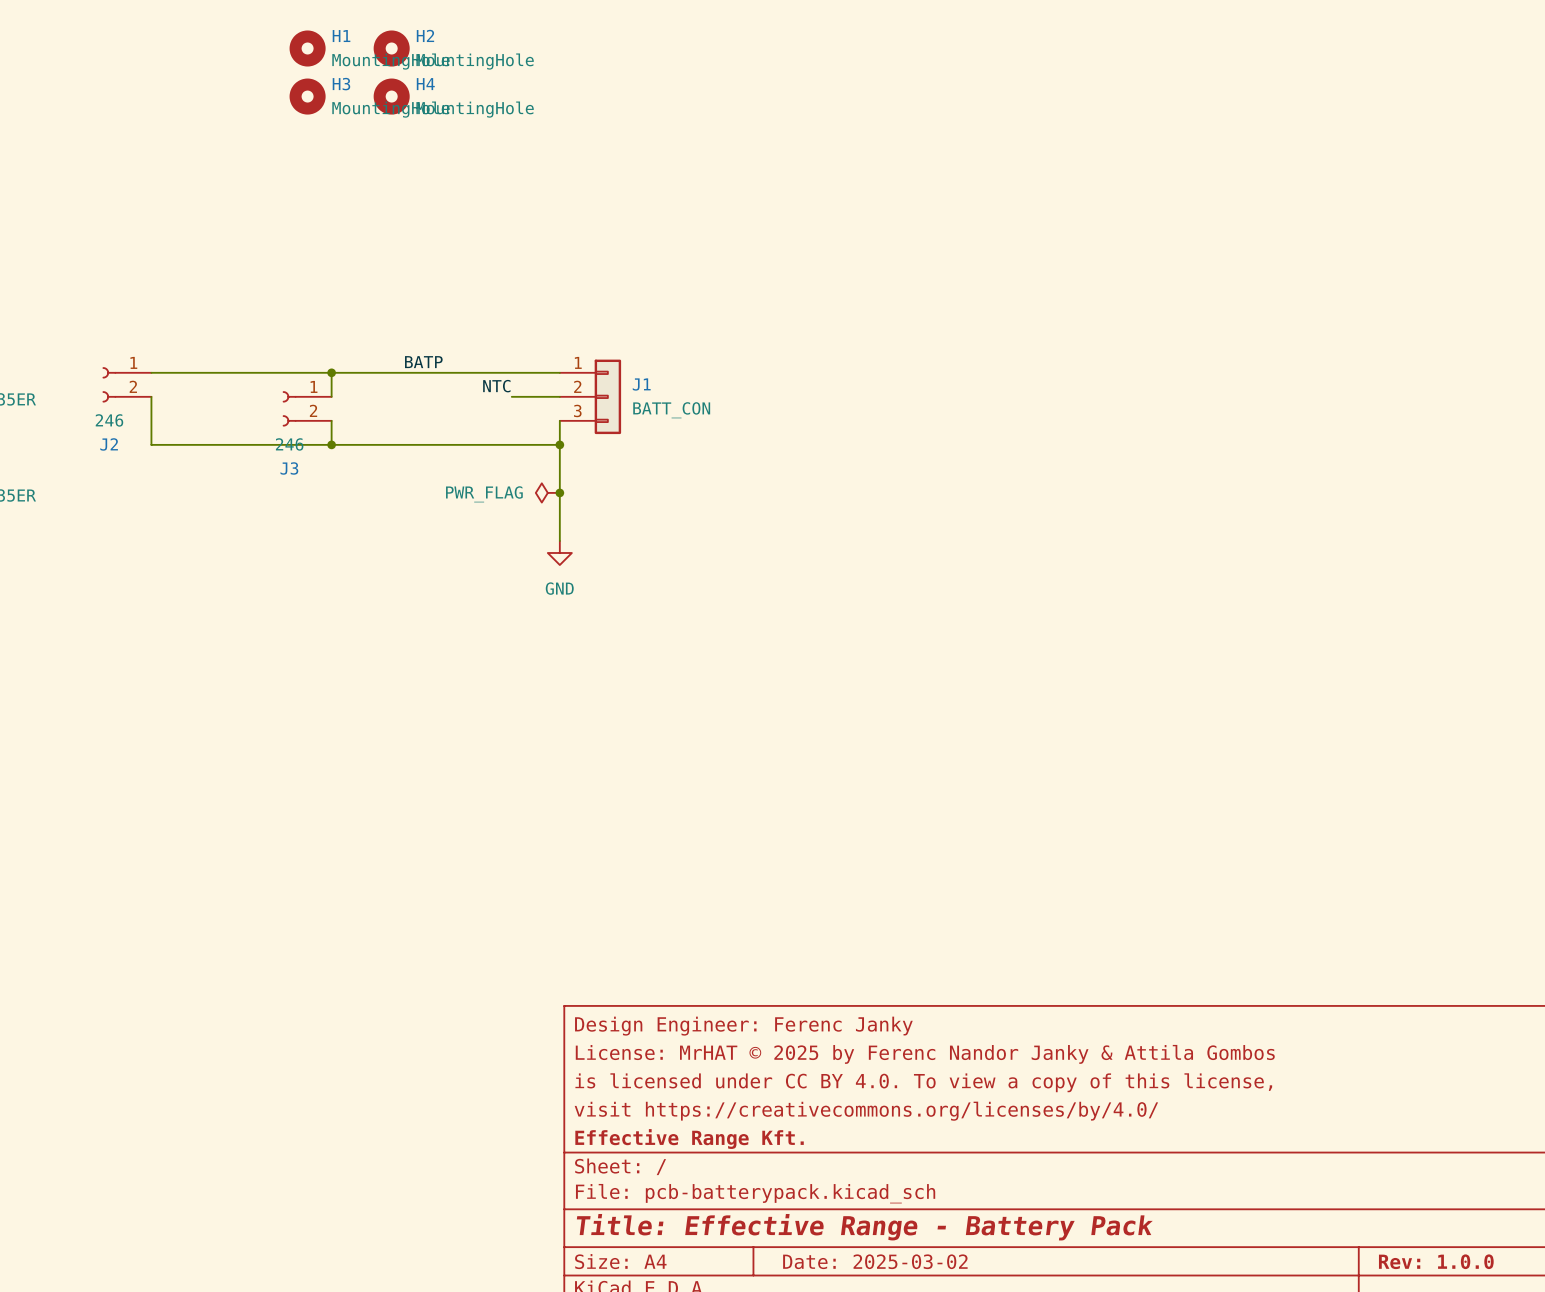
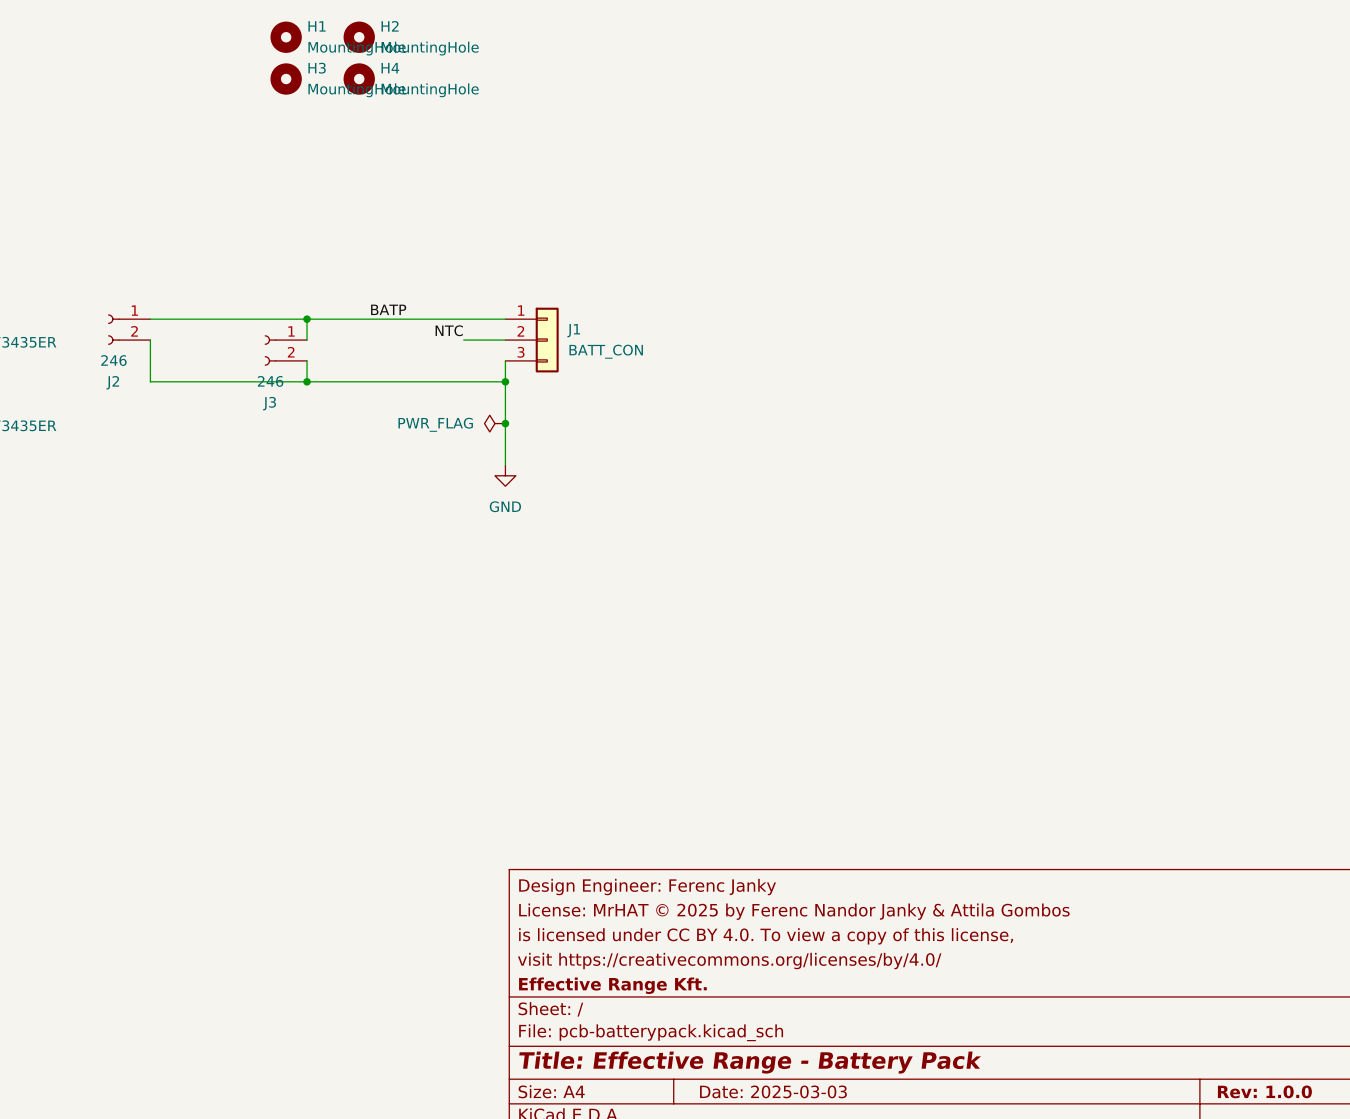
title block: Date: 2025-03-02 (875, 1261) -> Date: 2025-03-03 (773, 1091)

